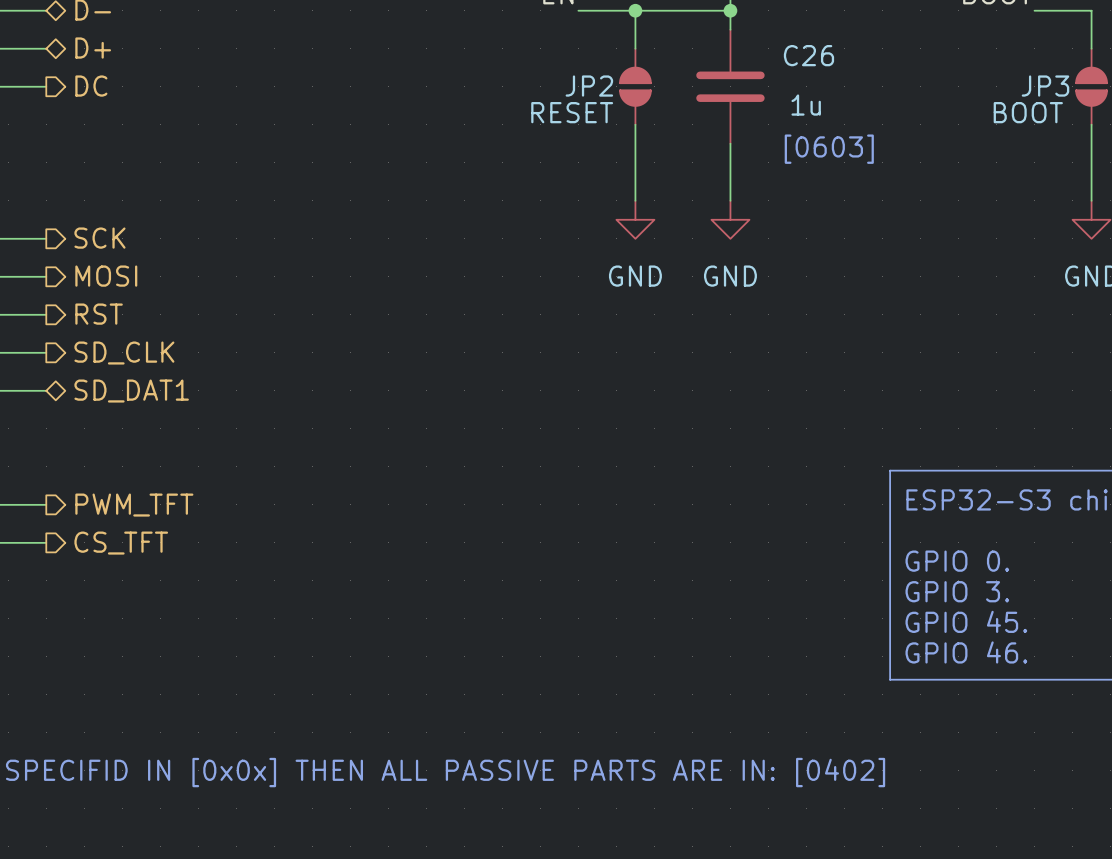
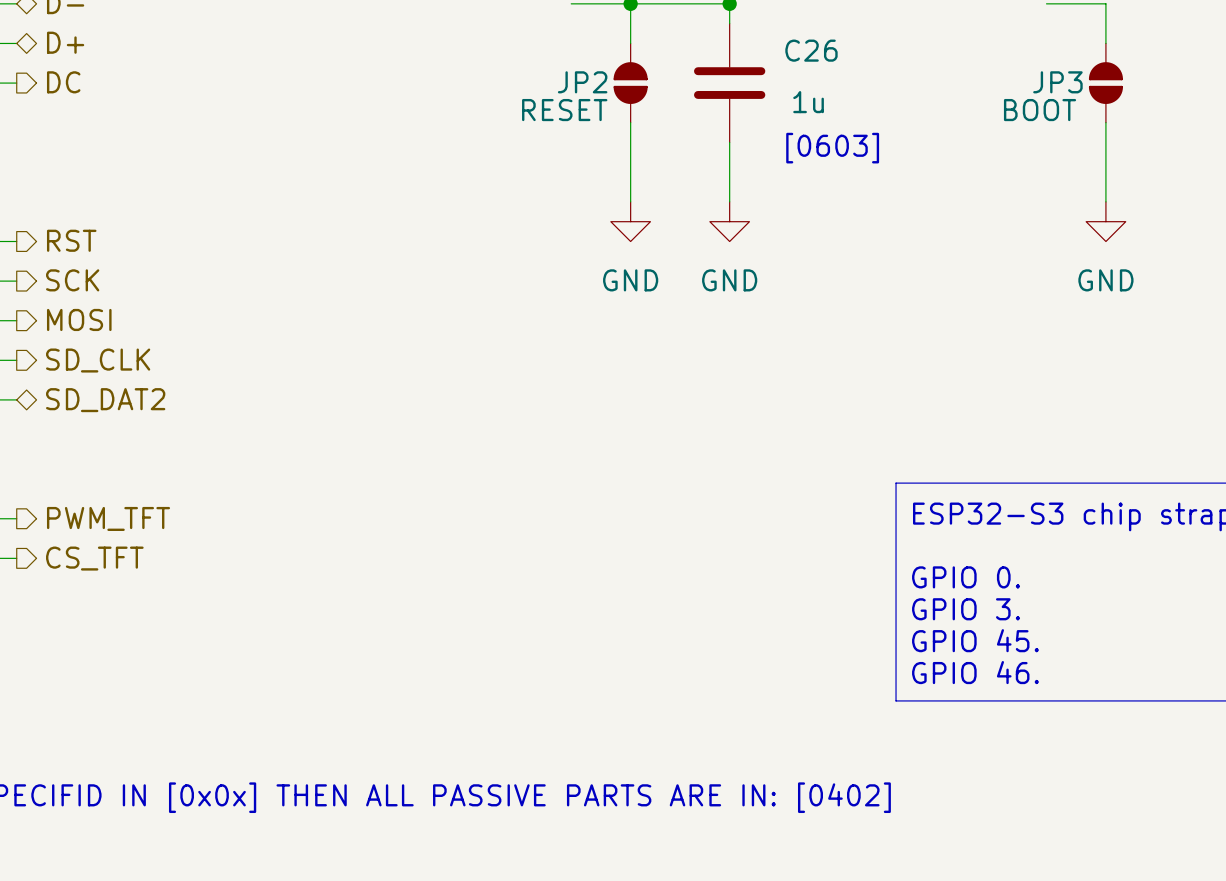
hierarchical label: SCK (99, 238) -> RST (71, 240)
hierarchical label: MOSI (106, 276) -> SCK (72, 280)
hierarchical label: RST (99, 314) -> MOSI (79, 319)
hierarchical label: SD_DAT1 (131, 391) -> SD_DAT2 (105, 400)

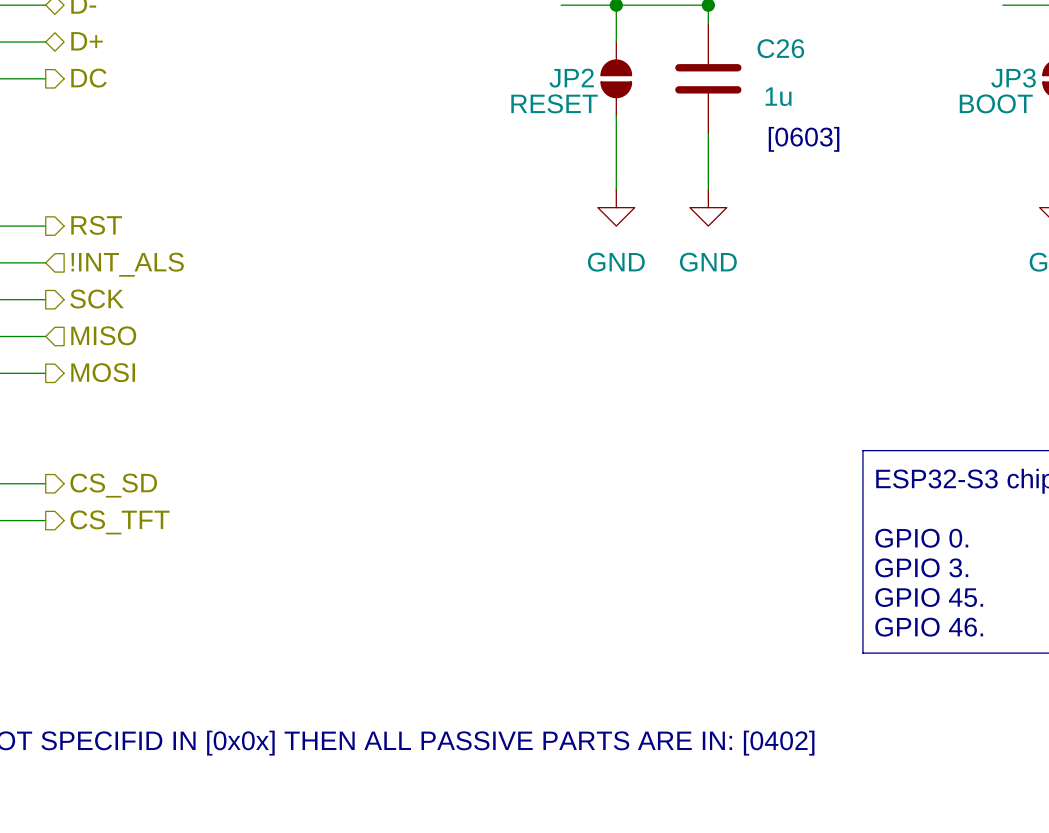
hierarchical label shape: output (72, 280) -> input (127, 264)
hierarchical label: SCK (72, 280) -> !INT_ALS (127, 264)
hierarchical label: MOSI (79, 319) -> SCK (97, 298)
hierarchical label shape: output (98, 360) -> input (103, 335)
hierarchical label: SD_CLK (98, 360) -> MISO (103, 335)
hierarchical label shape: bidirectional (105, 400) -> output (103, 372)
hierarchical label: SD_DAT2 (105, 400) -> MOSI (103, 372)
hierarchical label: PWM_TFT (108, 518) -> CS_SD (113, 485)

